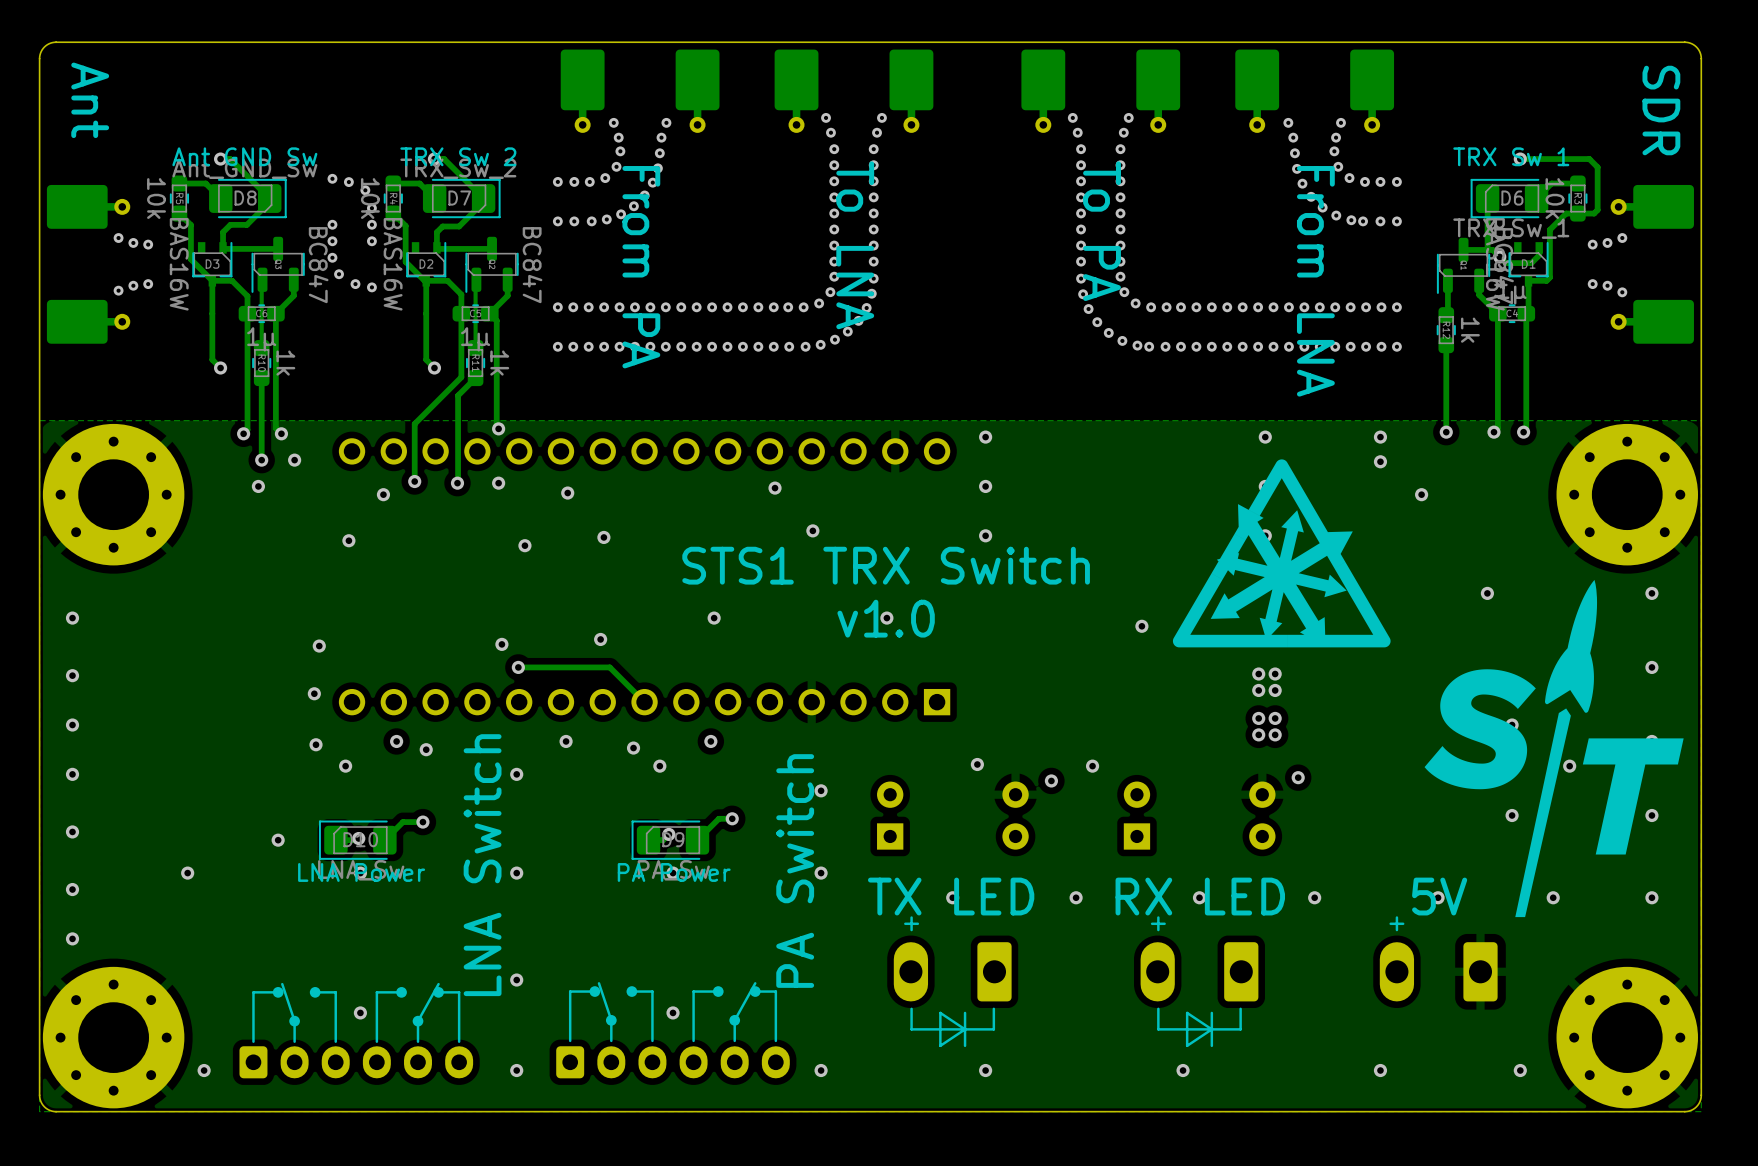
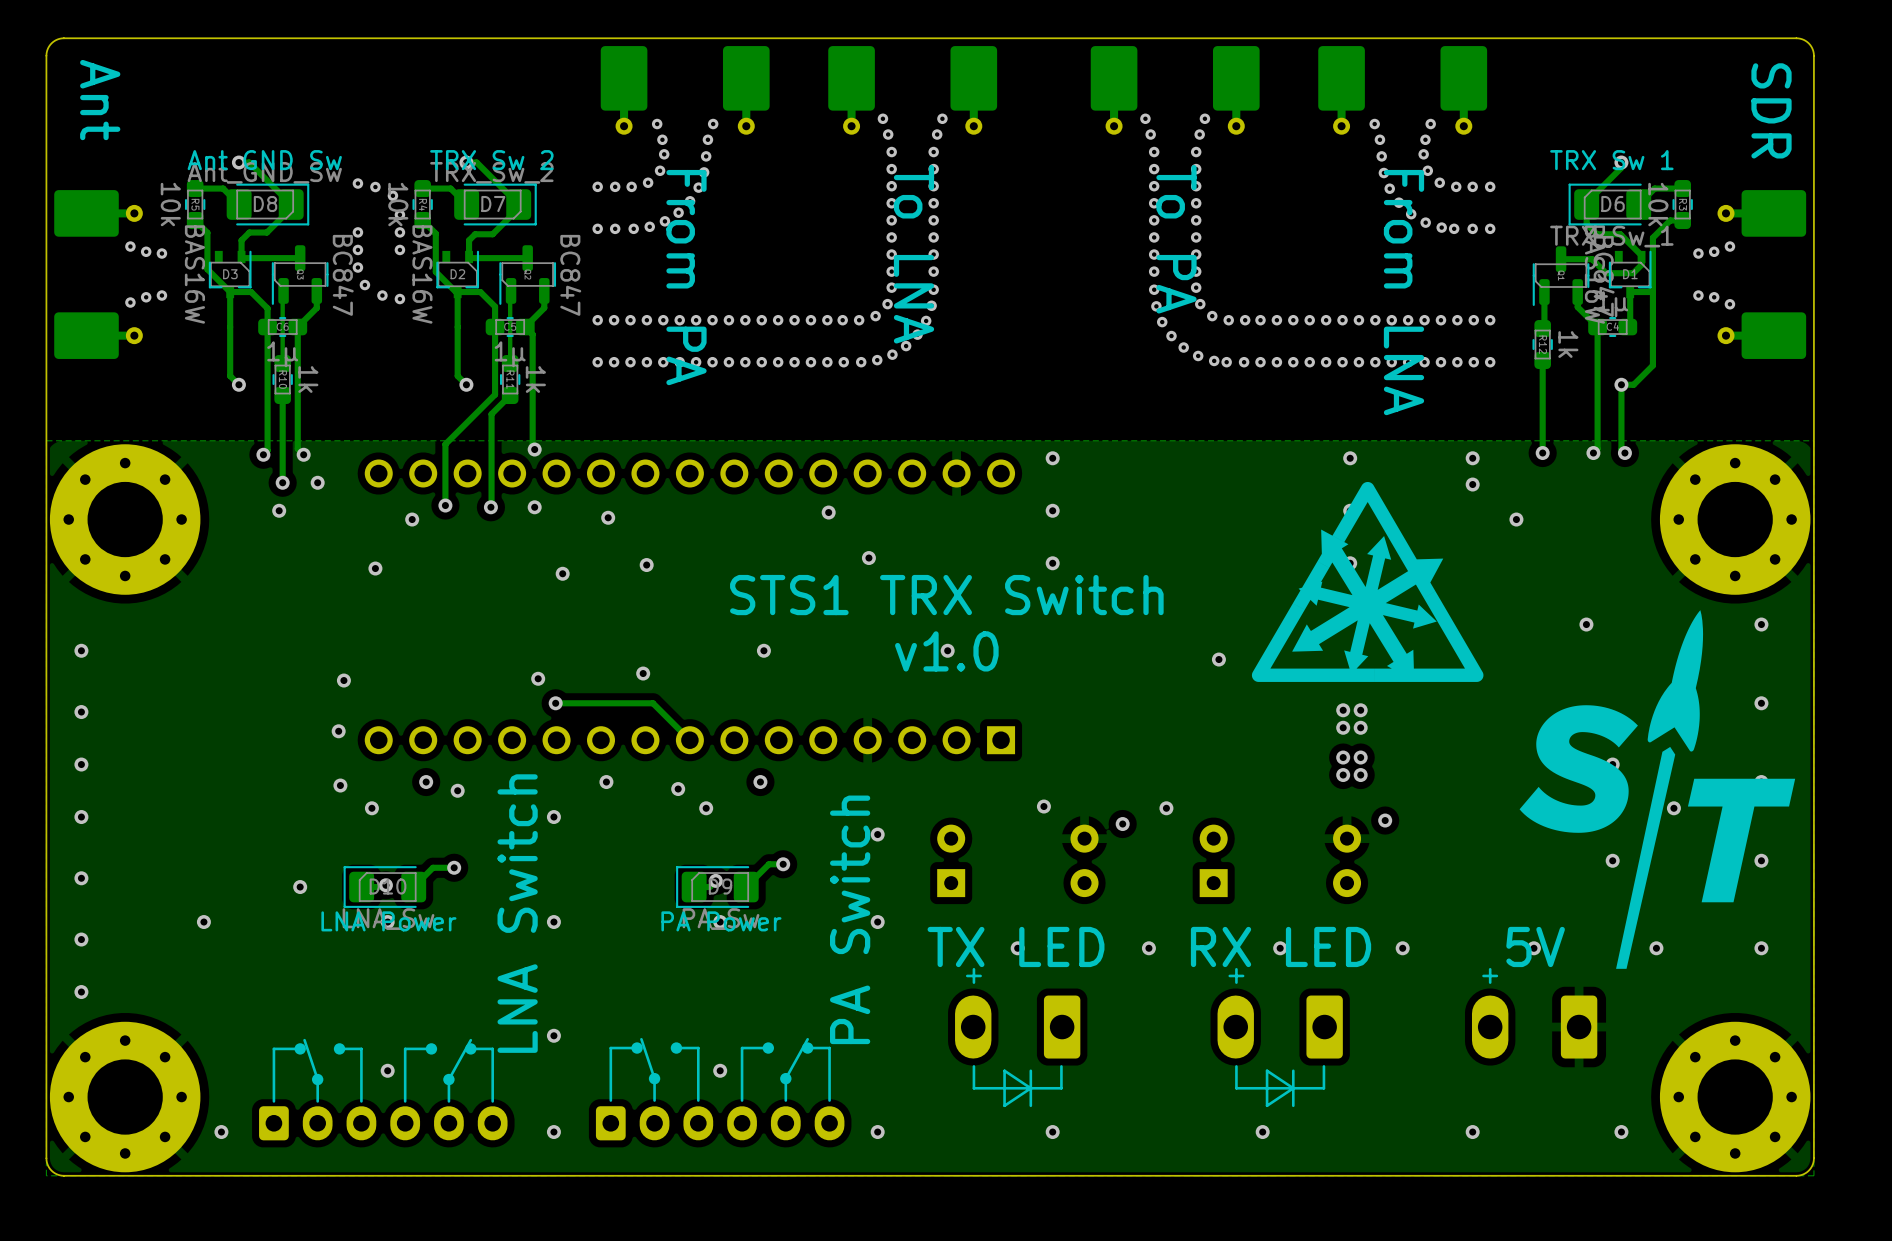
track: (1520, 159) (1589, 159) (1597, 167) (1597, 210) (1594, 213) (1577, 213) -> (1621, 162) (1621, 167) (1586, 202)
track: (1487, 216) (1487, 249) -> (1586, 223) (1596, 234) (1620, 234) (1641, 257)
via: (1499, 256) -> none
track: (1526, 313) (1526, 429) (1523, 432) -> (1652, 288) (1652, 365) (1633, 384) (1621, 384) (1621, 449) (1624, 453)
via: none -> (1621, 384)

